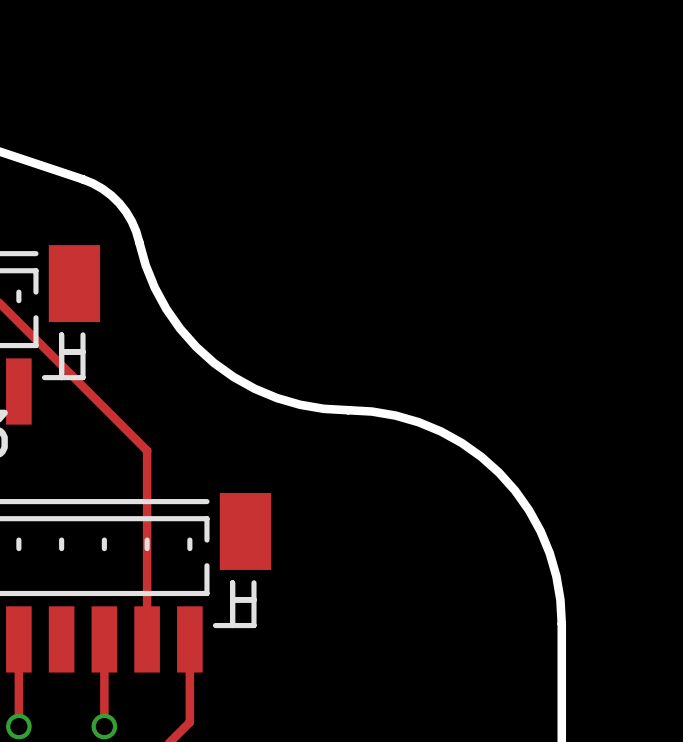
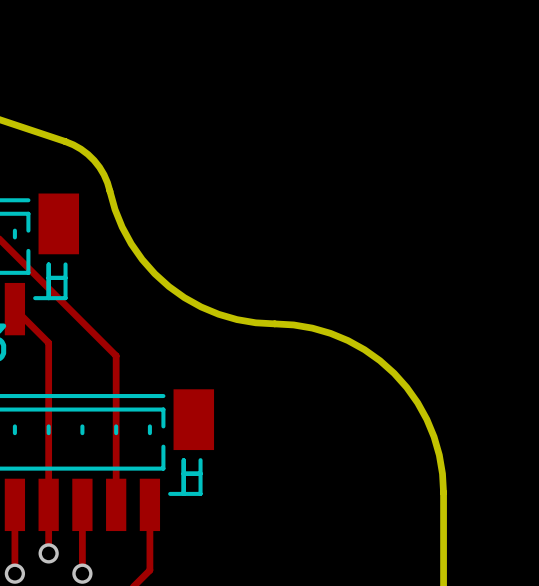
track: none -> (14, 309) (48, 342) (48, 553)
via: none -> (48, 553)

